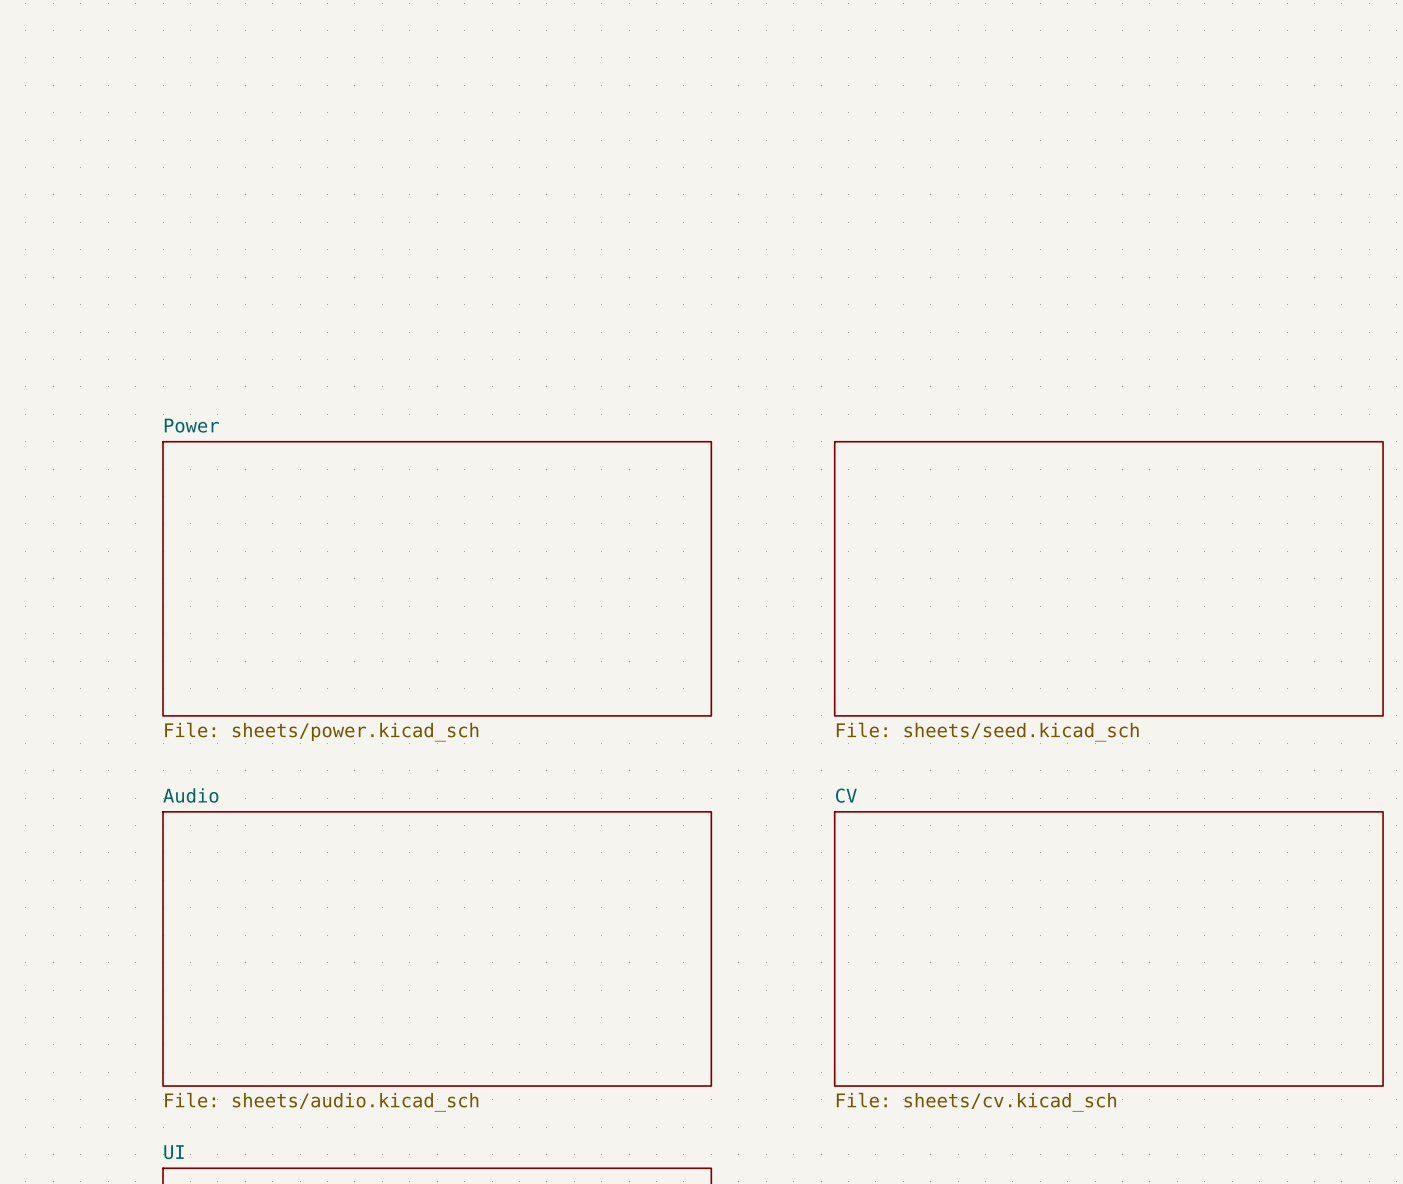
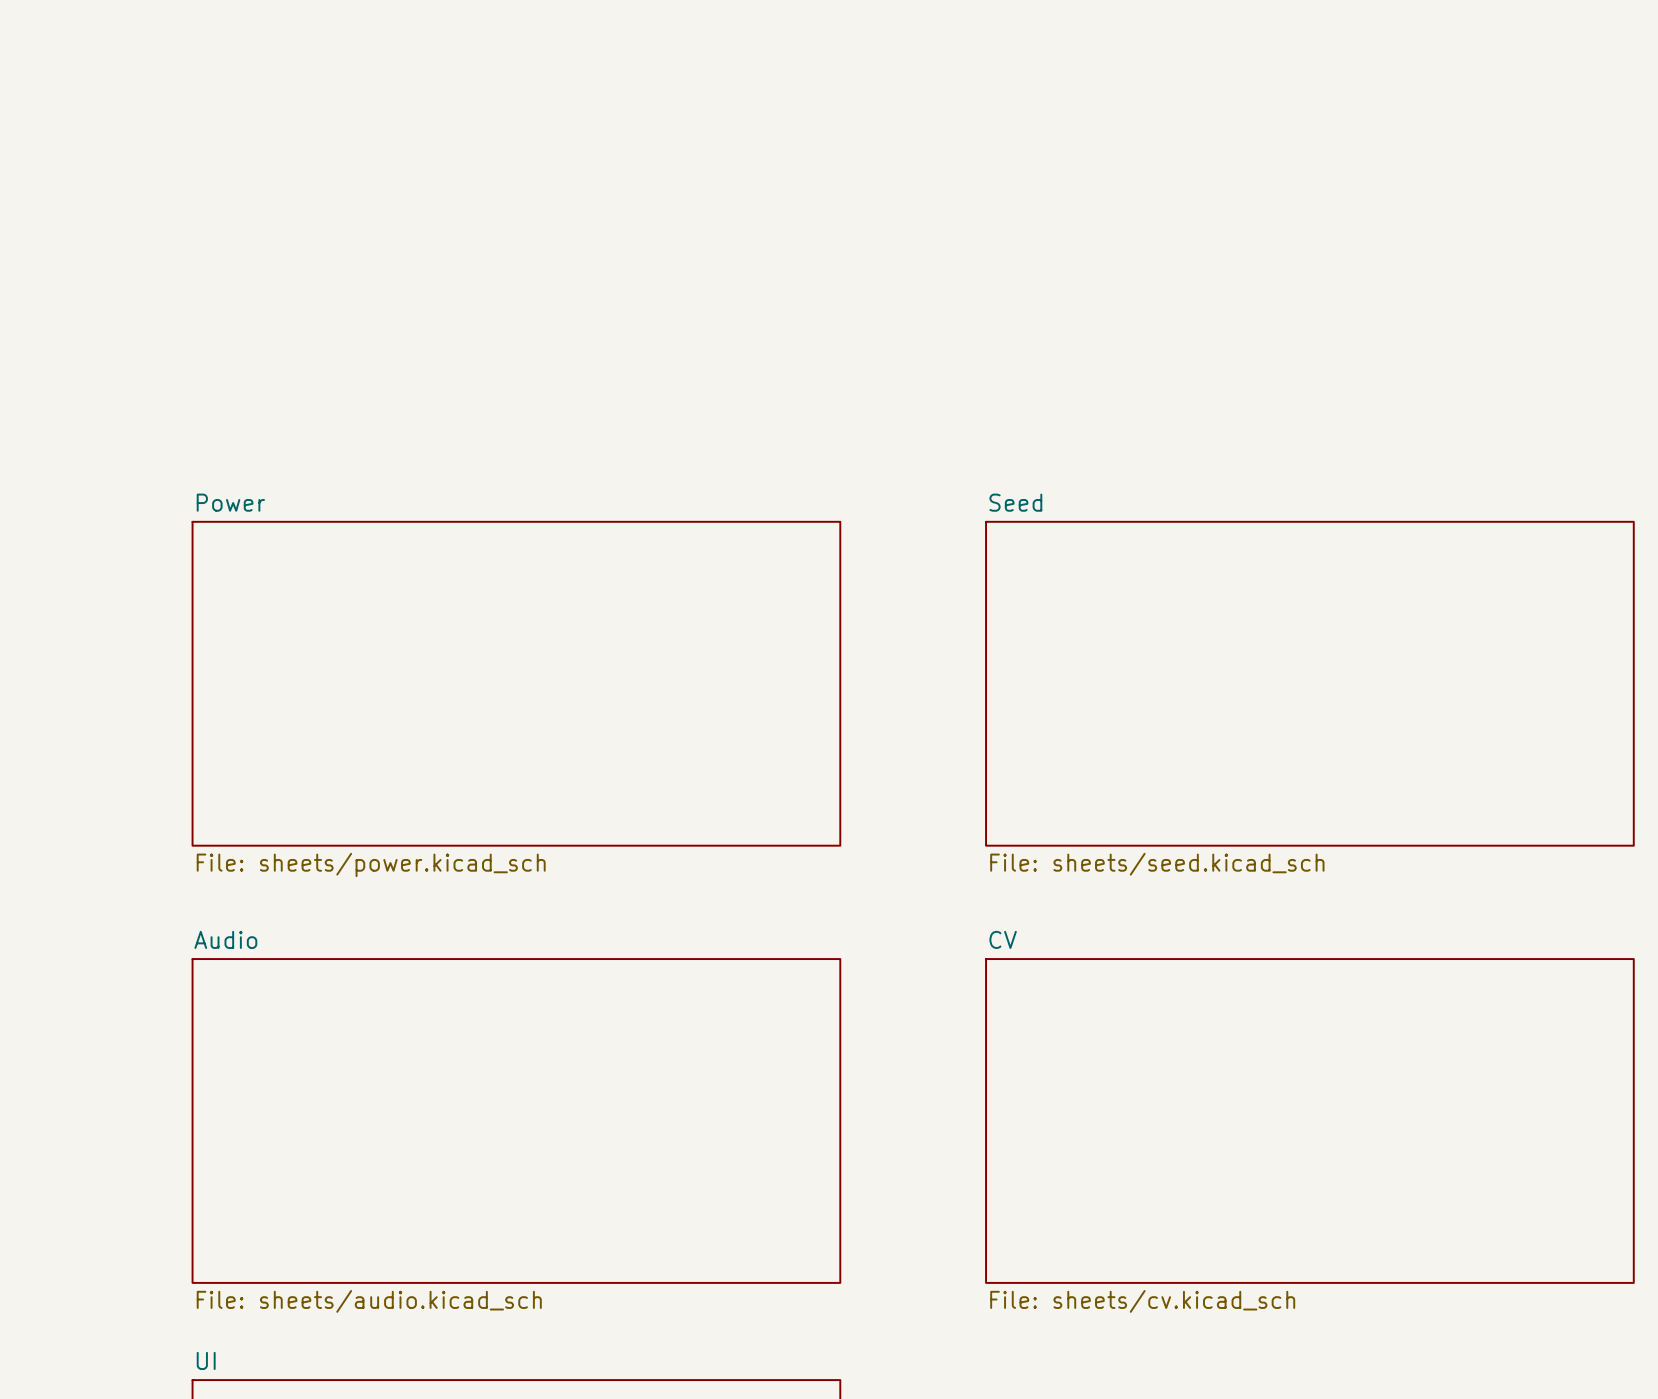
sheet Seed name: none -> Seed (1015, 502)

